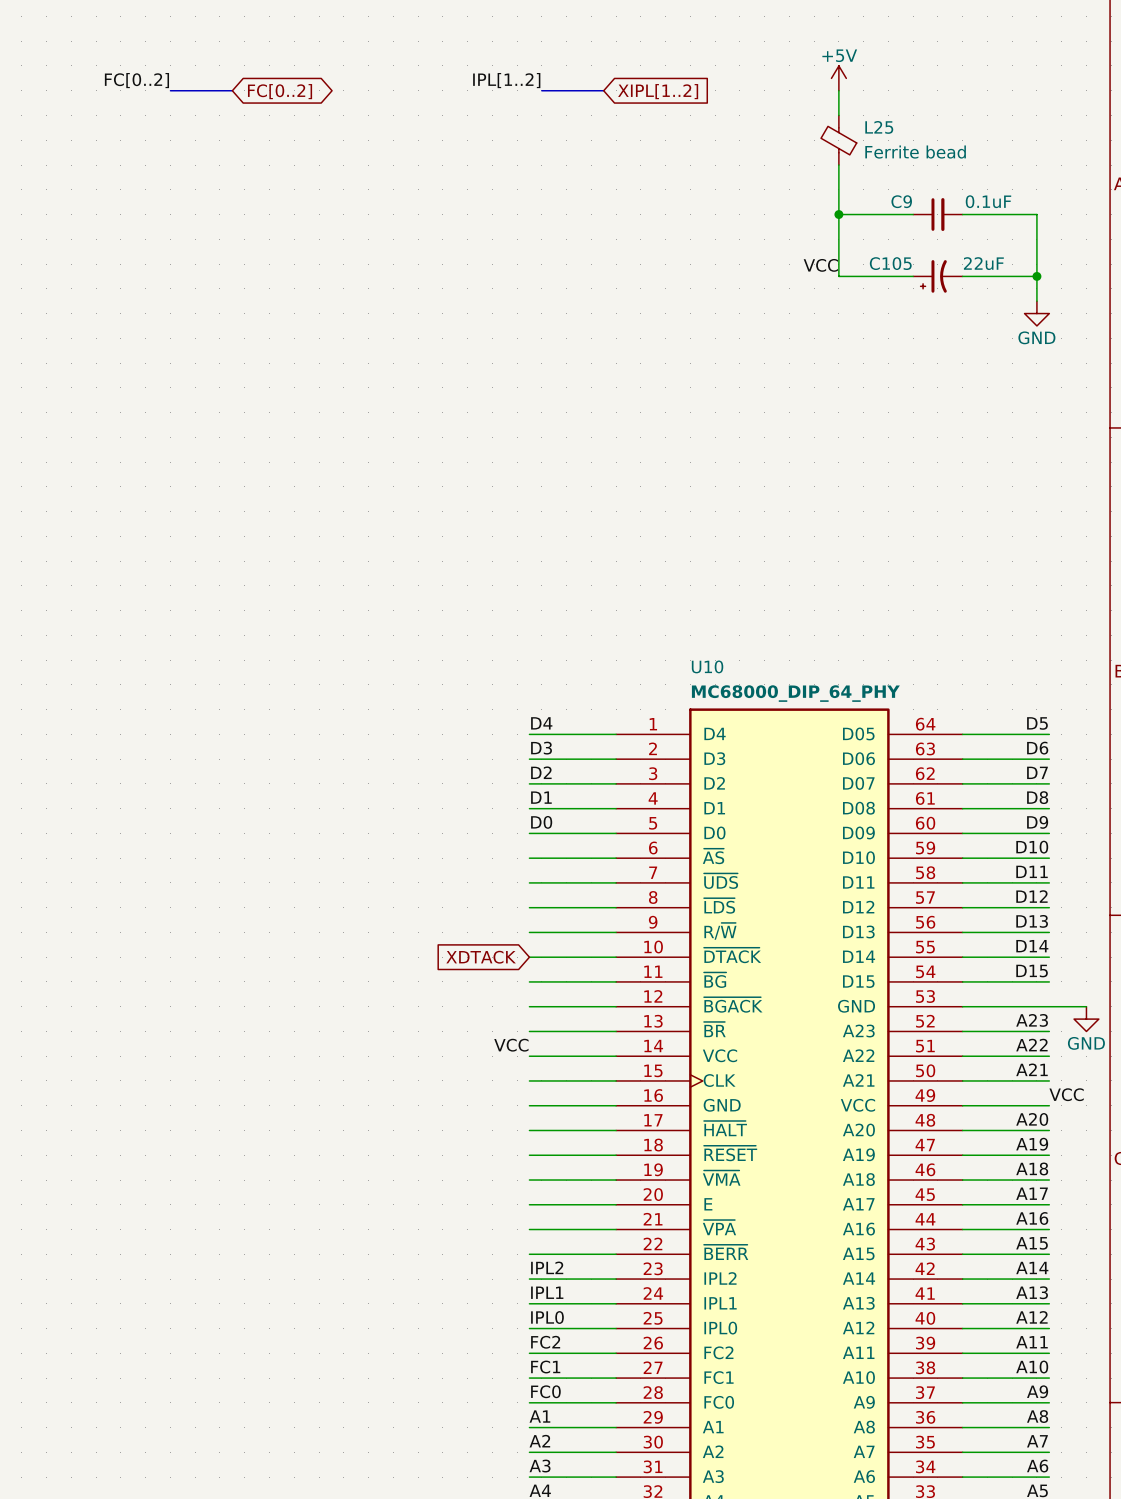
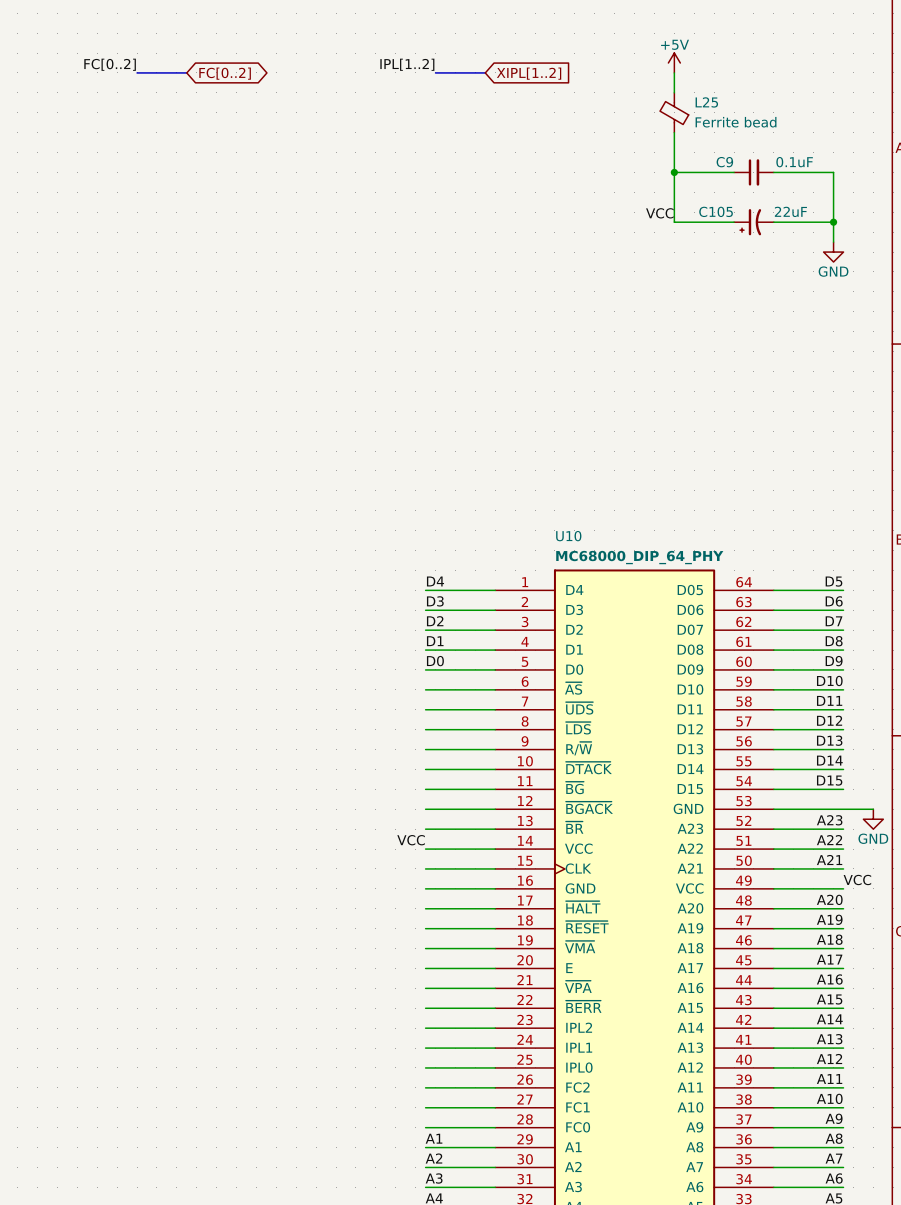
global label: XDTACK (481, 957) -> none
label: IPL2 (547, 1267) -> none
label: IPL1 (547, 1292) -> none
label: IPL0 (547, 1317) -> none
label: FC2 (545, 1342) -> none
label: FC1 (545, 1367) -> none
label: FC0 (545, 1391) -> none

